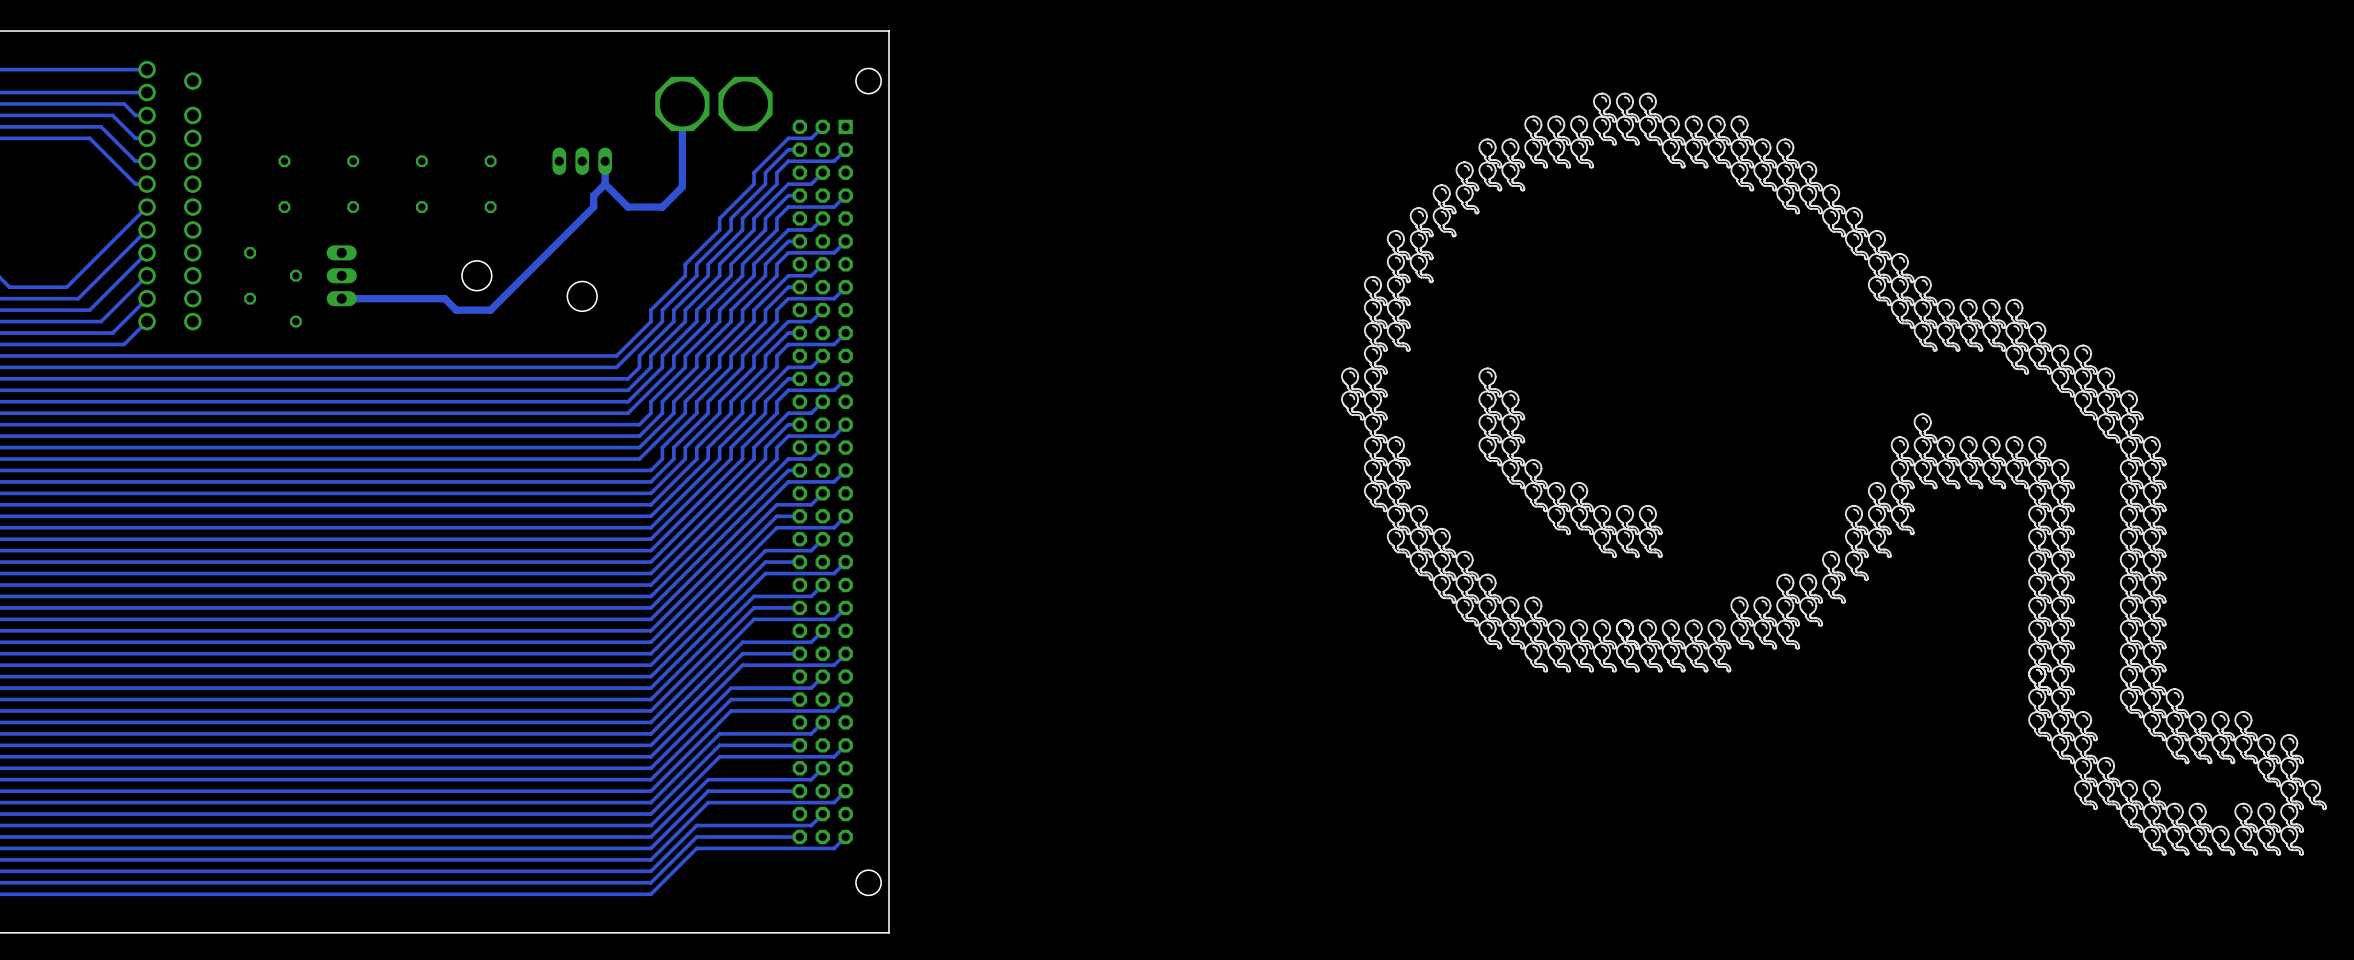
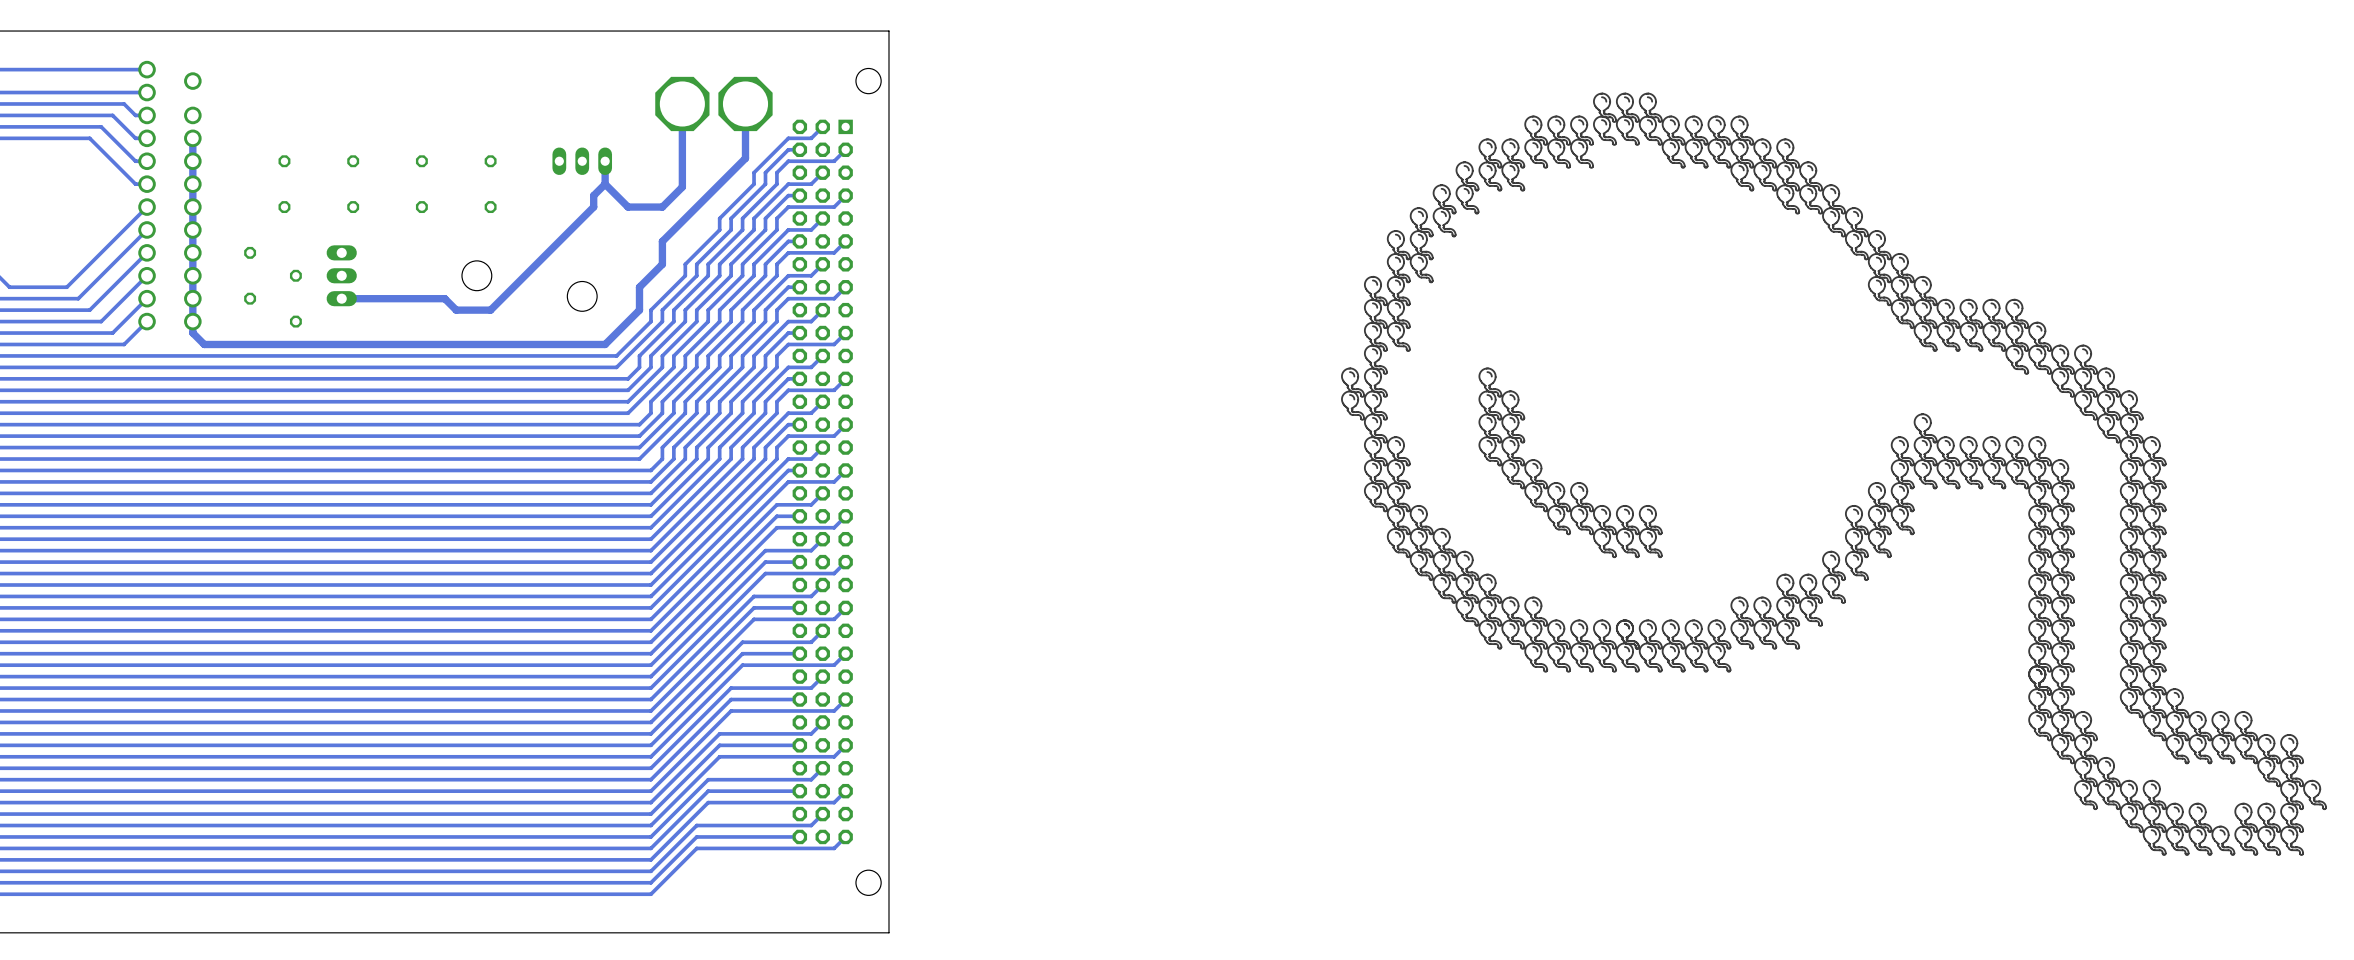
track: none -> (745, 103) (745, 158) (662, 241) (662, 264) (639, 287) (639, 310) (605, 344) (204, 344) (192, 333) (192, 138)

